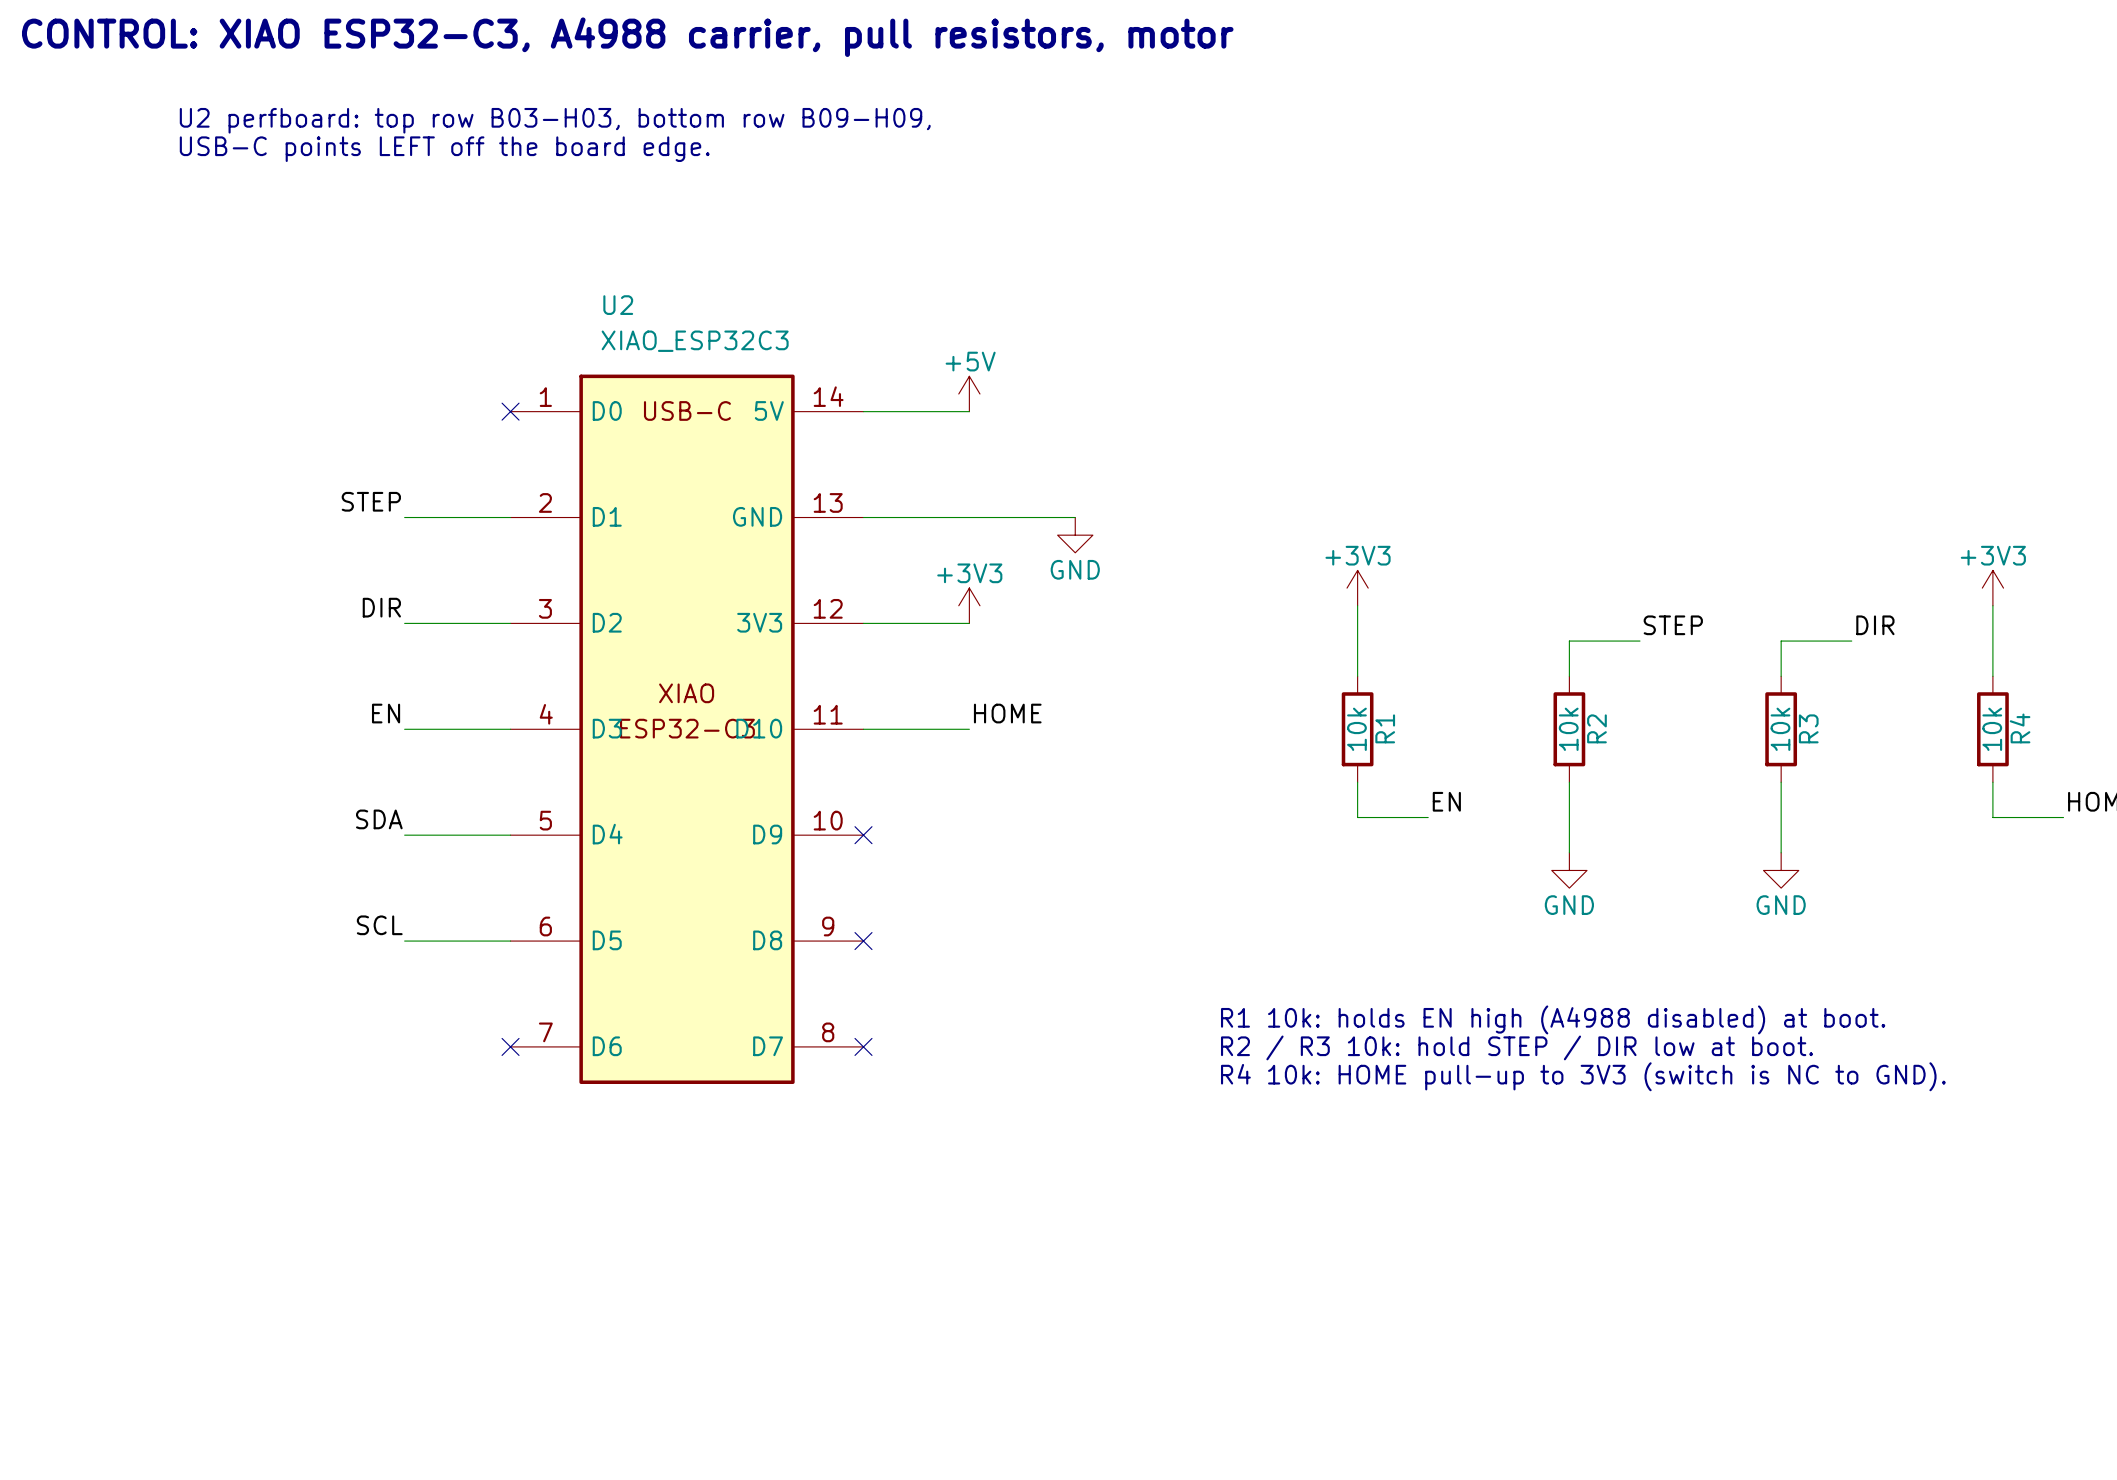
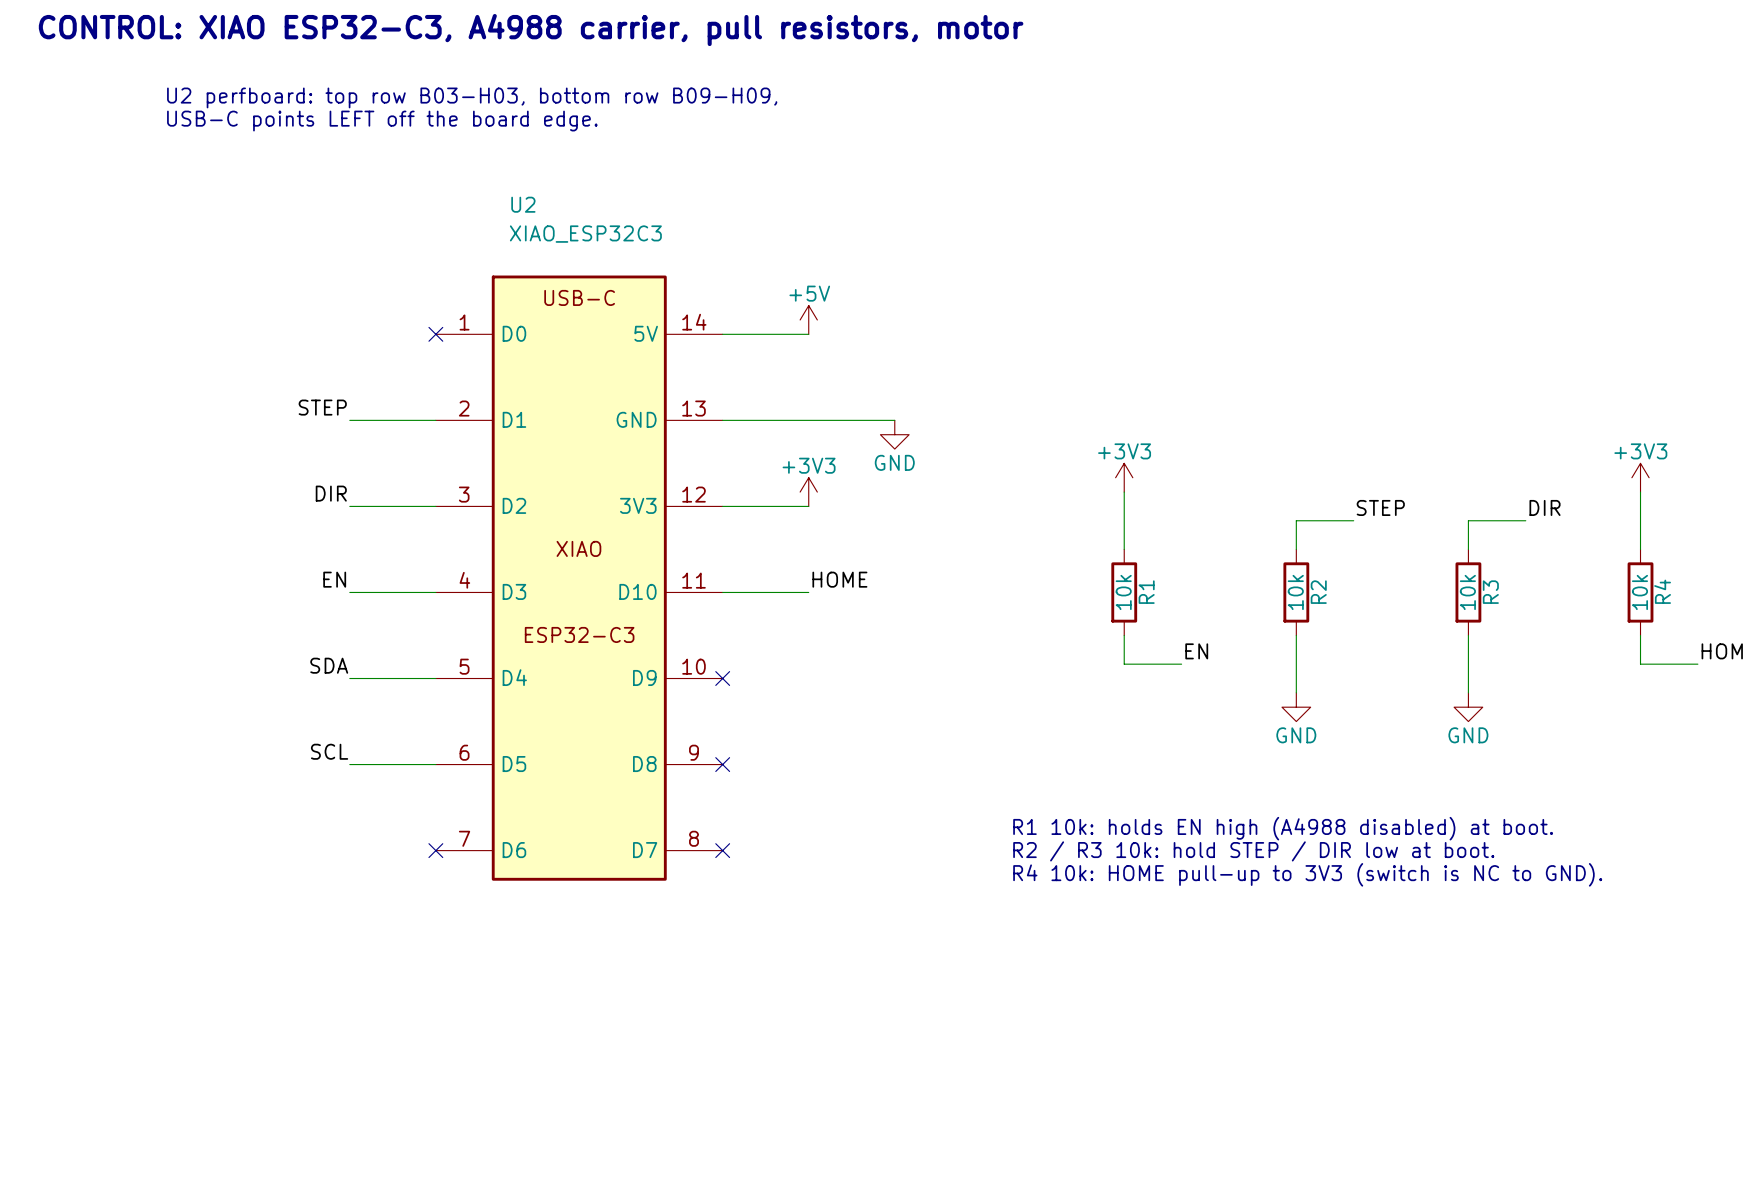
U2 name position: U2 (618, 305) -> U2 (523, 204)
U2 value position: XIAO_ESP32C3 (695, 341) -> XIAO_ESP32C3 (585, 234)
U2 symbol: [510, 374, 864, 1084] -> [435, 275, 723, 881]

